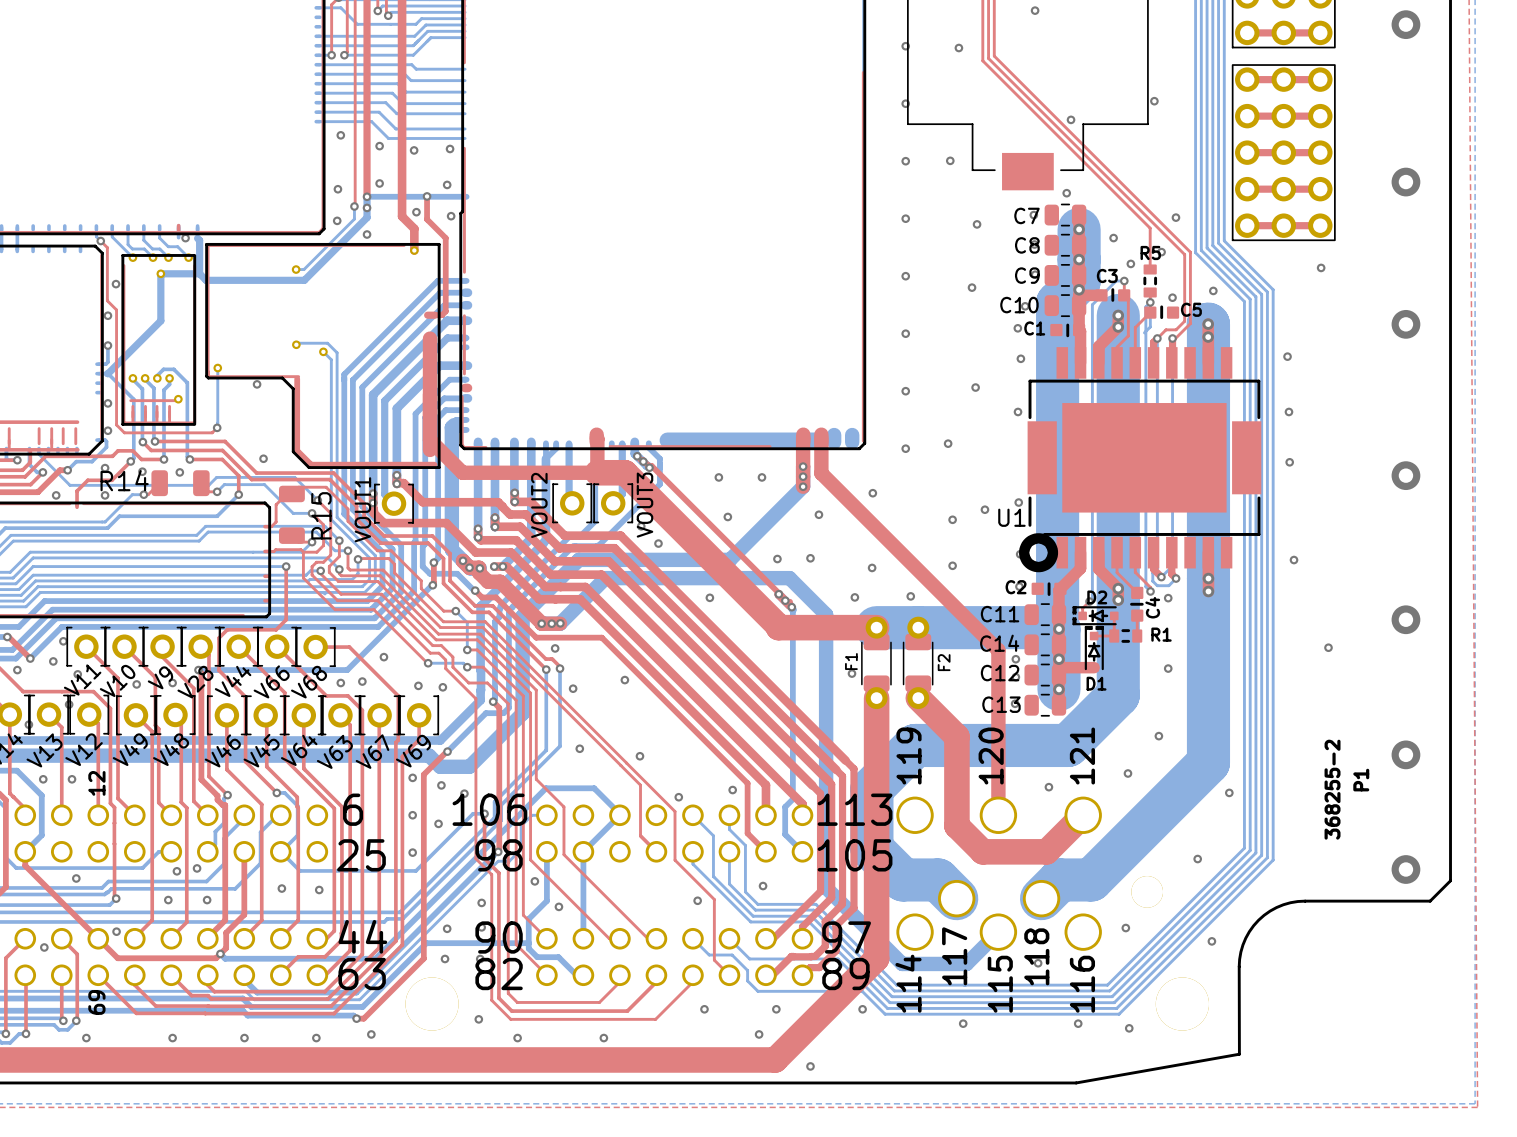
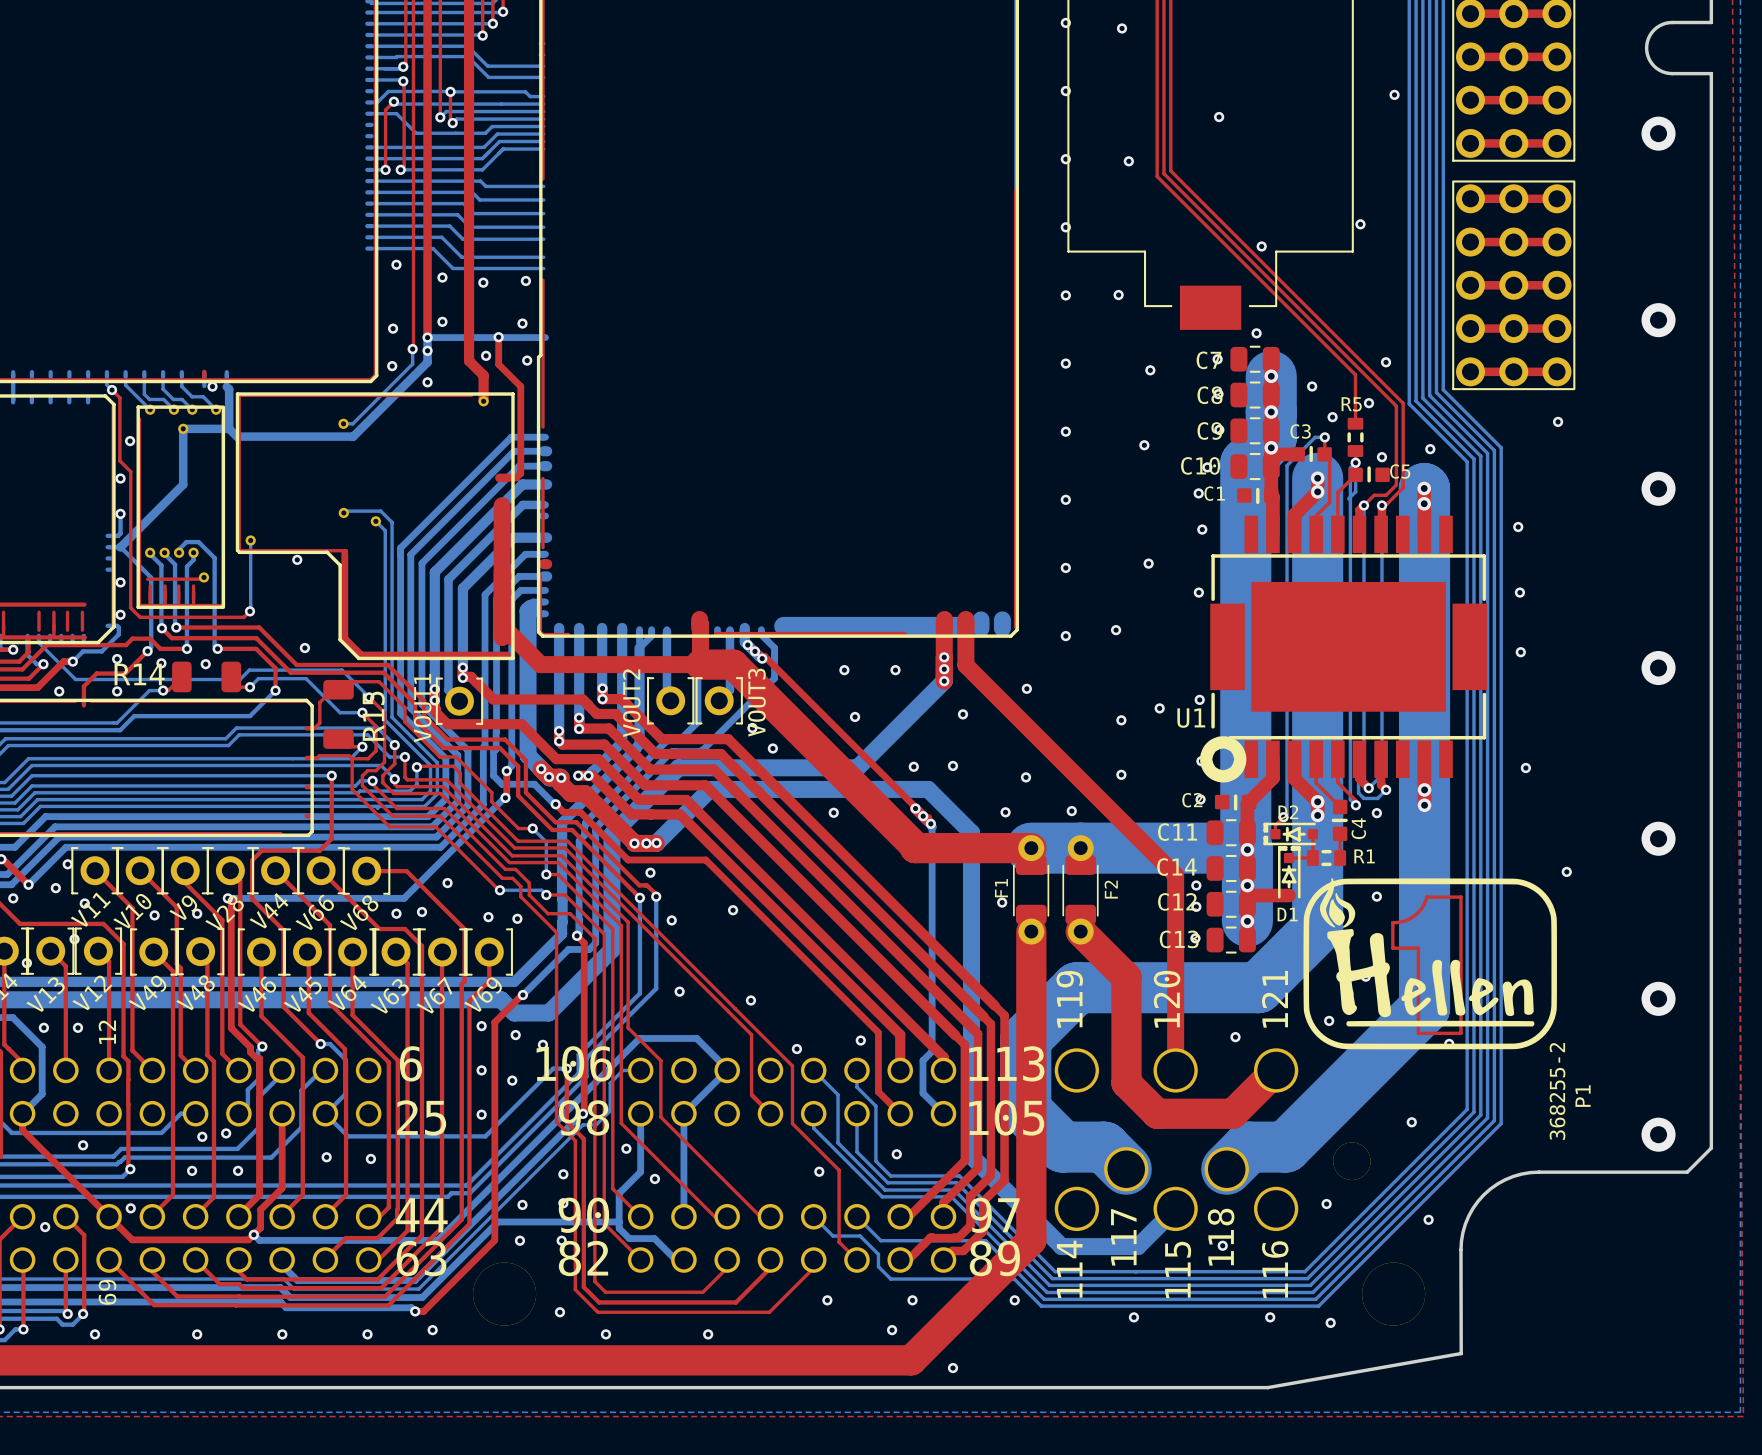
drawing: none -> [1303, 878, 1557, 1050]
P1 name position: P1 (1361, 780) -> P1 (1583, 1096)
P1 value position: 368255-2 (1332, 789) -> 368255-2 (1557, 1091)

